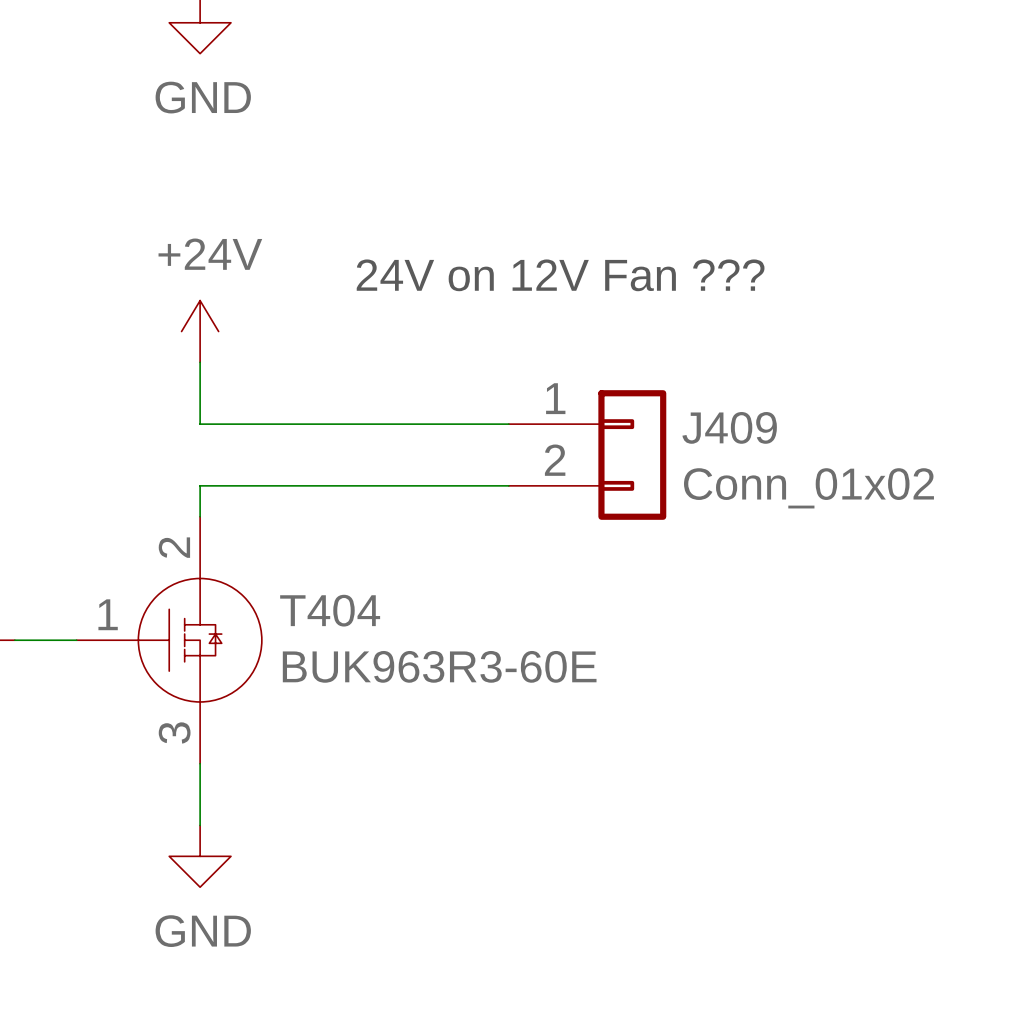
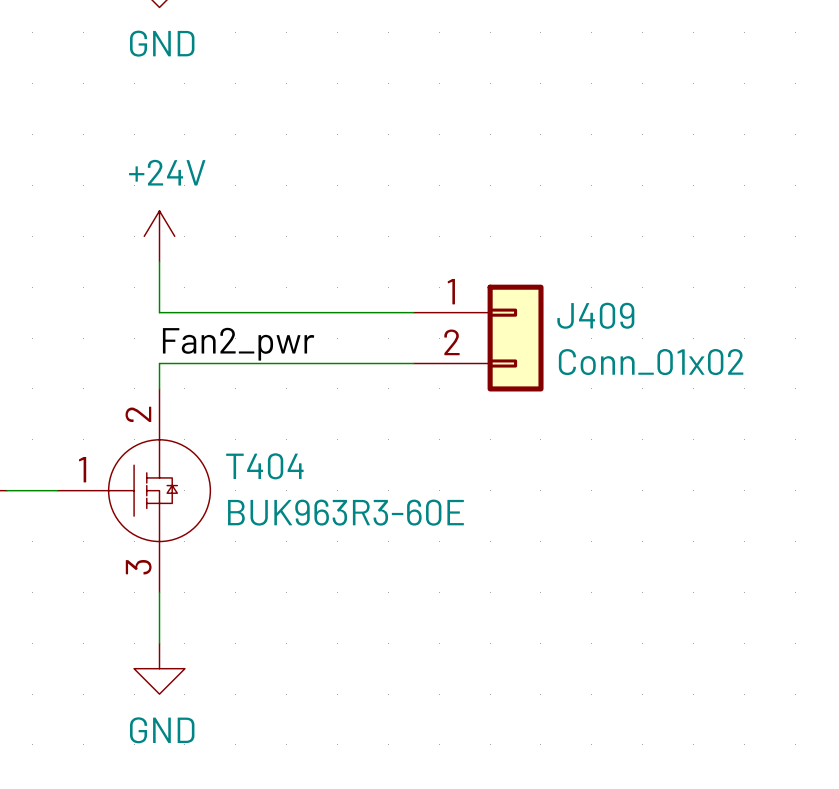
text: 24V on 12V Fan ??? (560, 275) -> none
label: none -> Fan2_pwr (238, 344)

